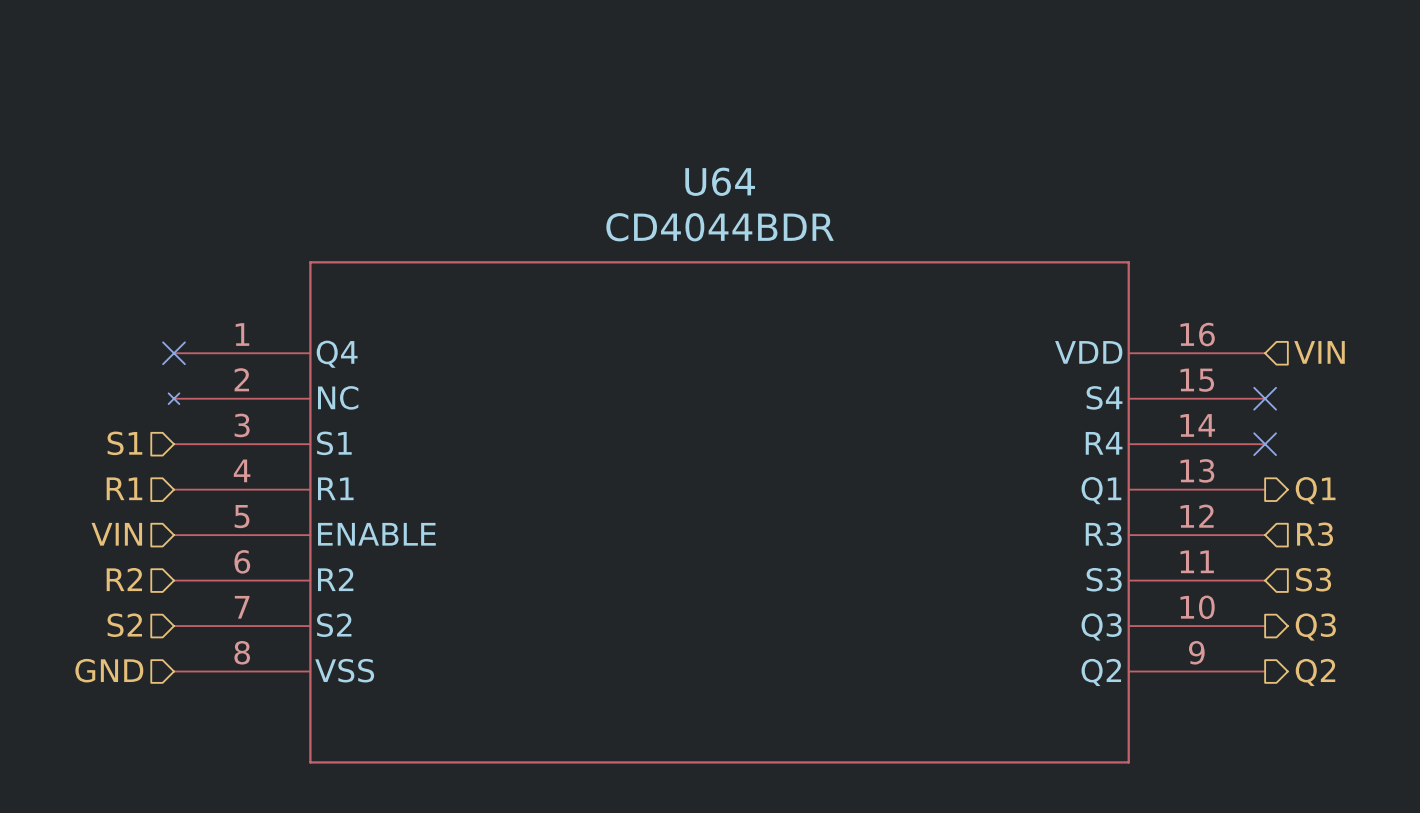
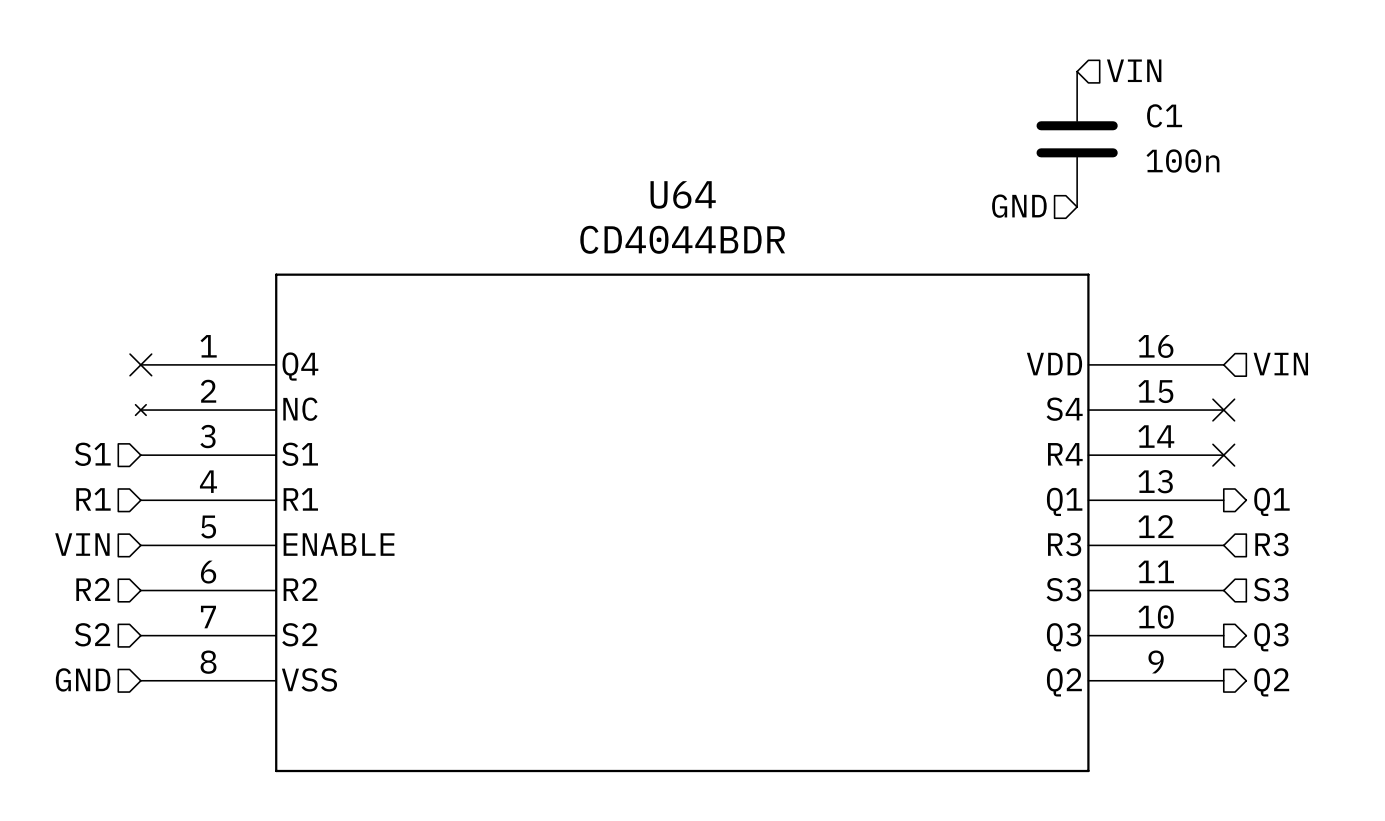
hierarchical label: none -> VIN (1134, 70)
C1: none -> 100n (1077, 139)
hierarchical label: none -> GND (1019, 206)

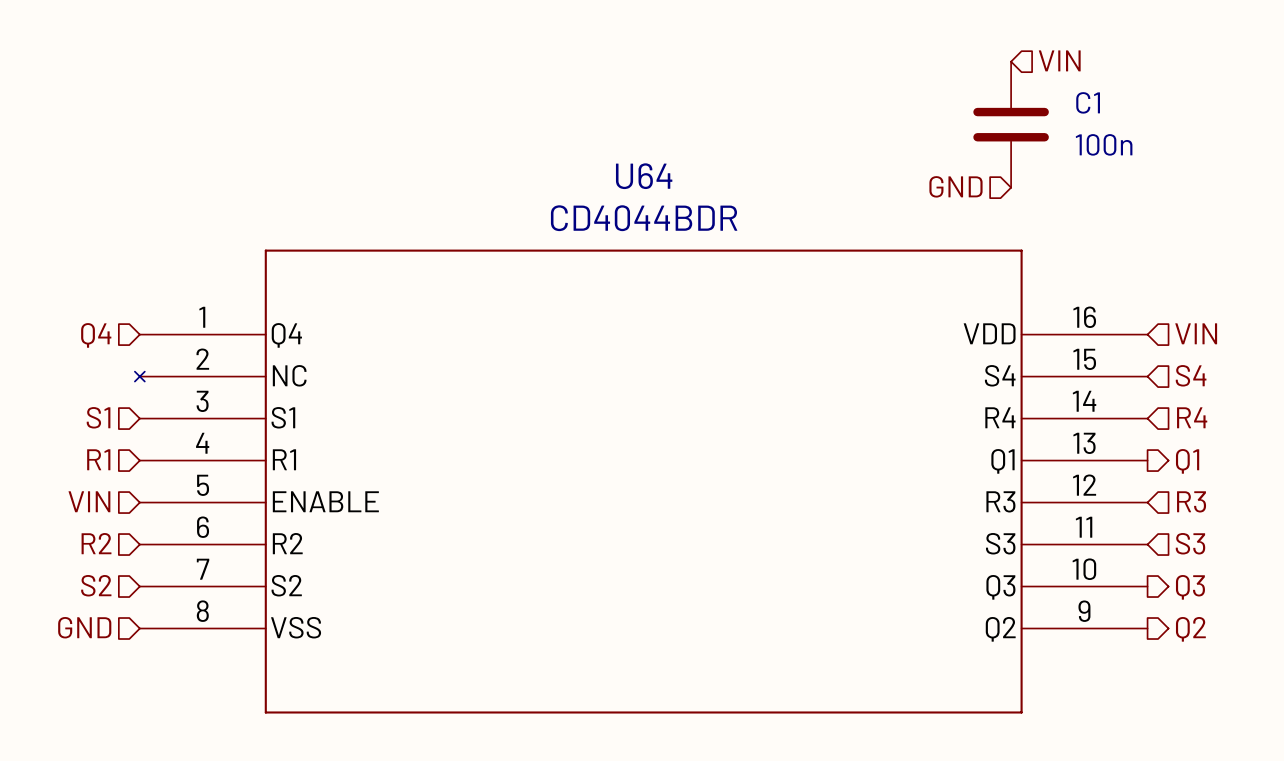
no-connect mark: (140, 364) -> none
hierarchical label: none -> Q4 (96, 335)
hierarchical label: none -> S4 (1191, 375)
no-connect mark: (1223, 410) -> none
hierarchical label: none -> R4 (1192, 417)
no-connect mark: (1223, 455) -> none

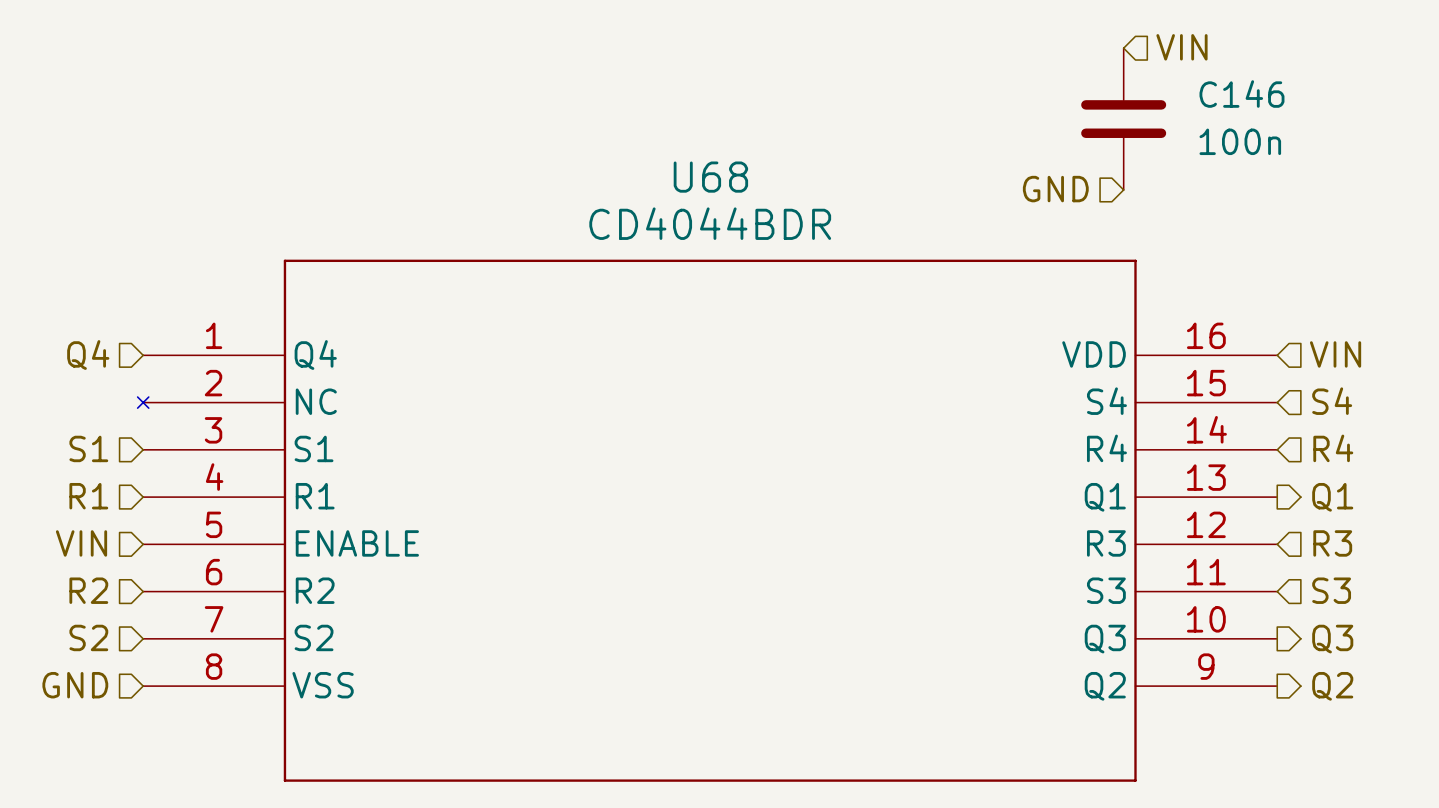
C1 name: C1 (1088, 102) -> C146 (1241, 94)
U64 name: U64 (644, 176) -> U68 (710, 177)

